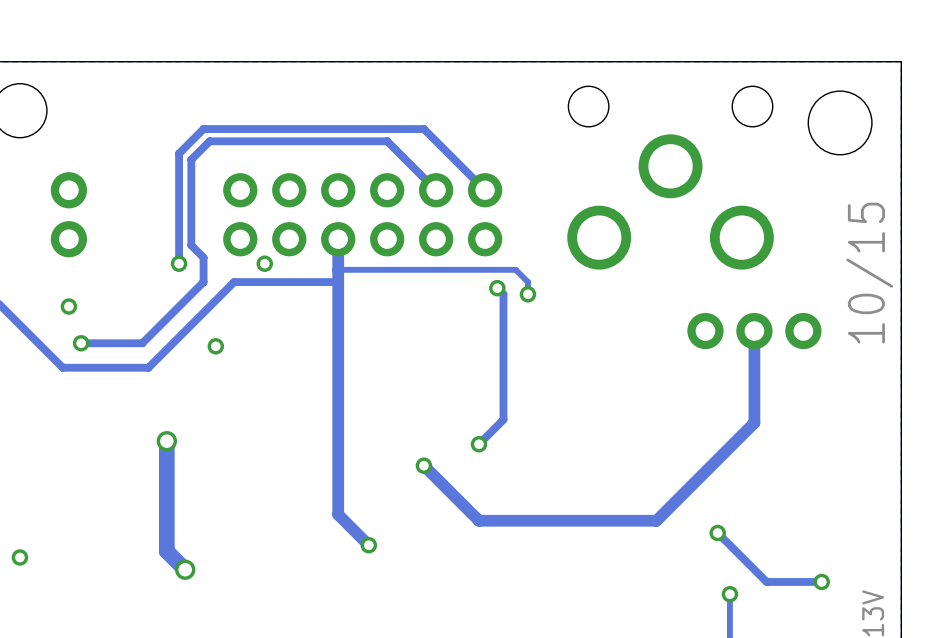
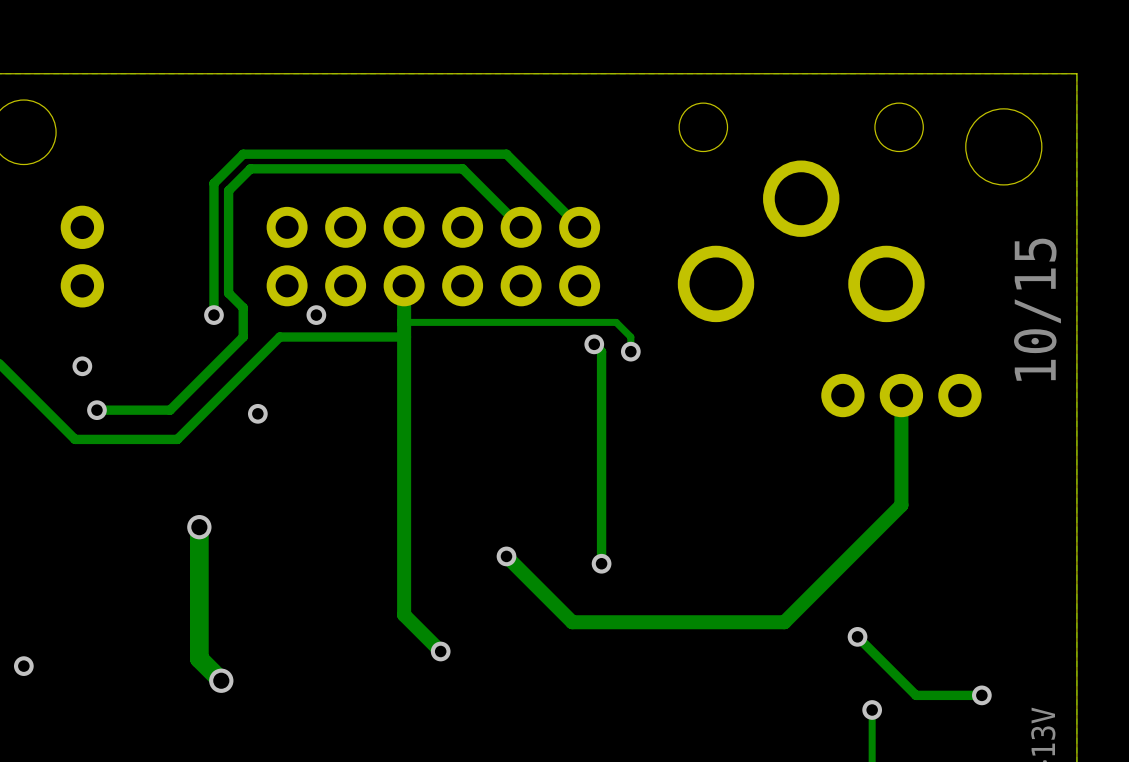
track: (503, 419) (478, 444) -> (601, 501) (601, 563)
via position: (478, 444) -> (601, 563)

